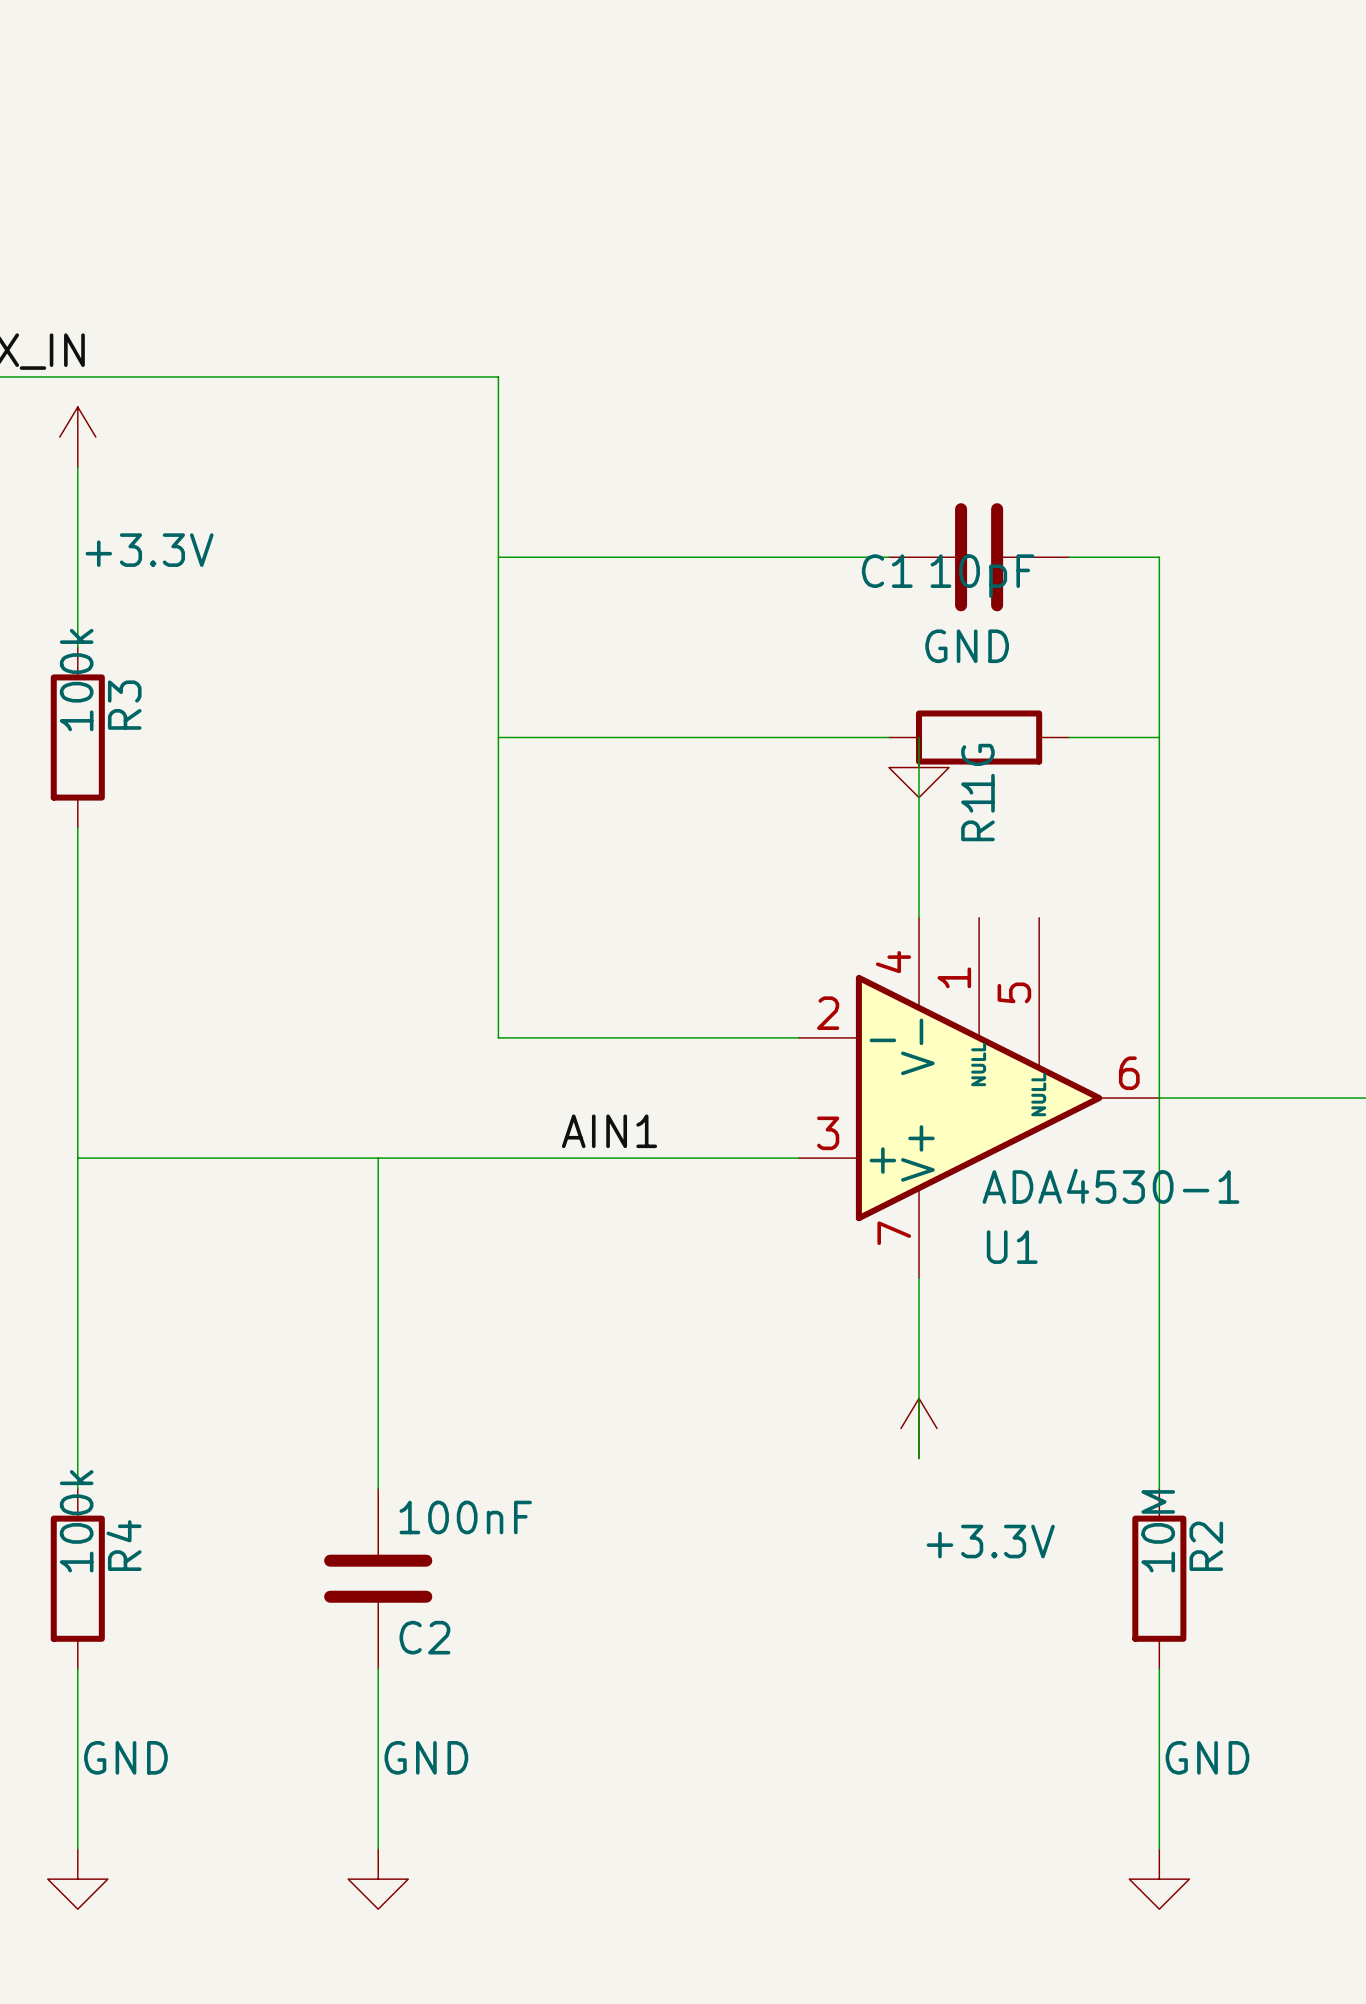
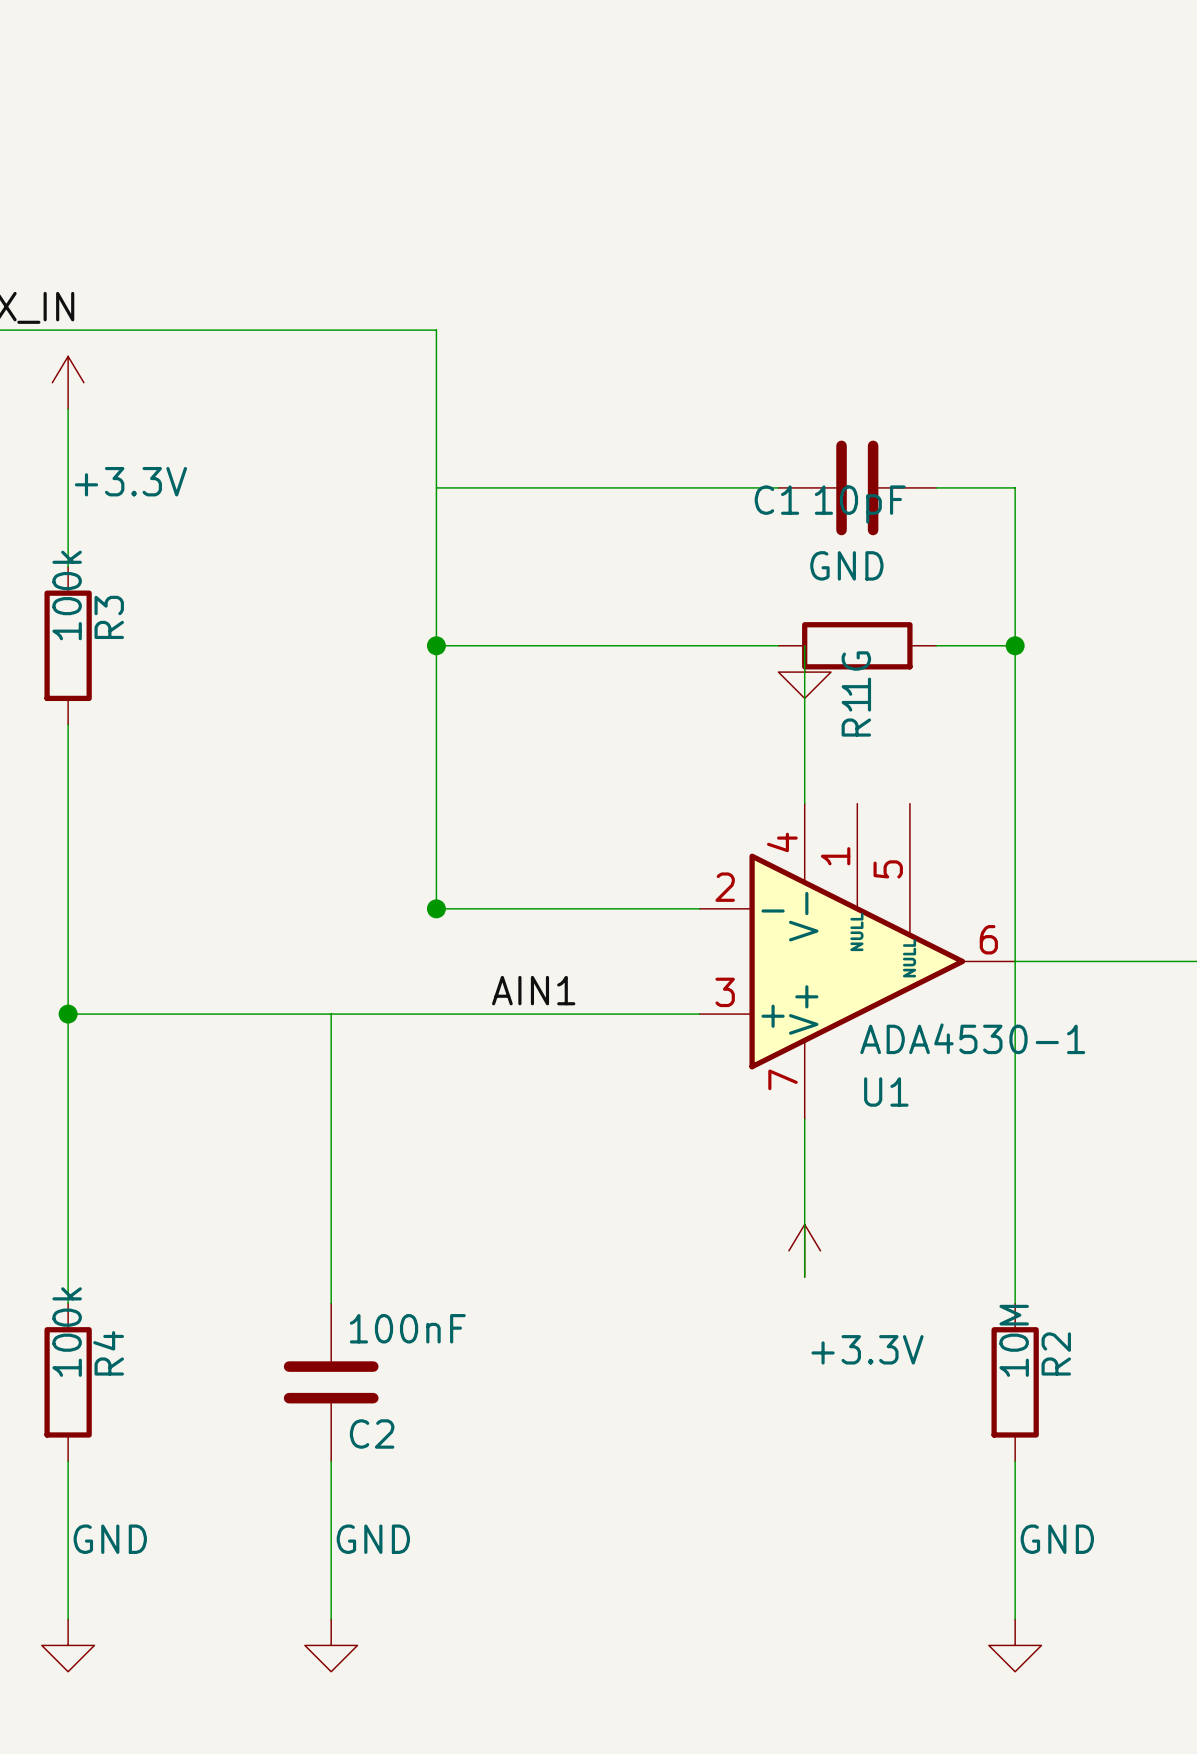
junction: none -> (436, 645)
junction: none -> (1015, 645)
junction: none -> (436, 908)
junction: none -> (68, 1014)

